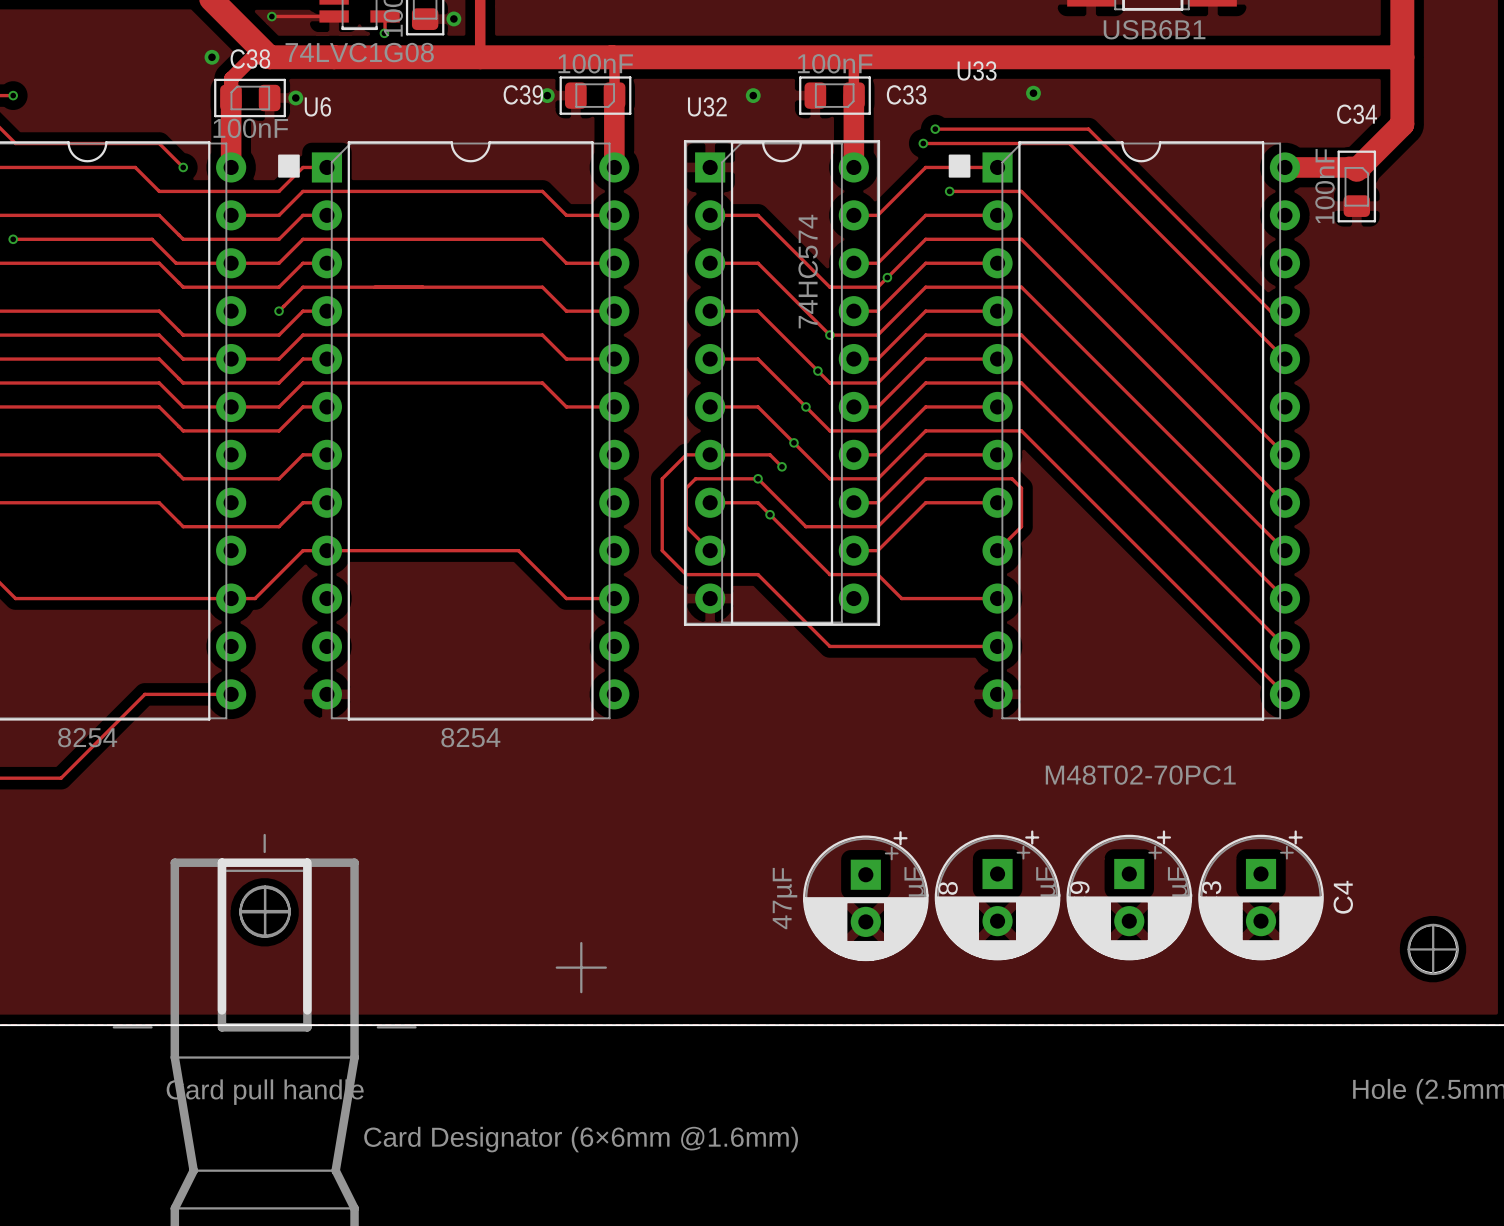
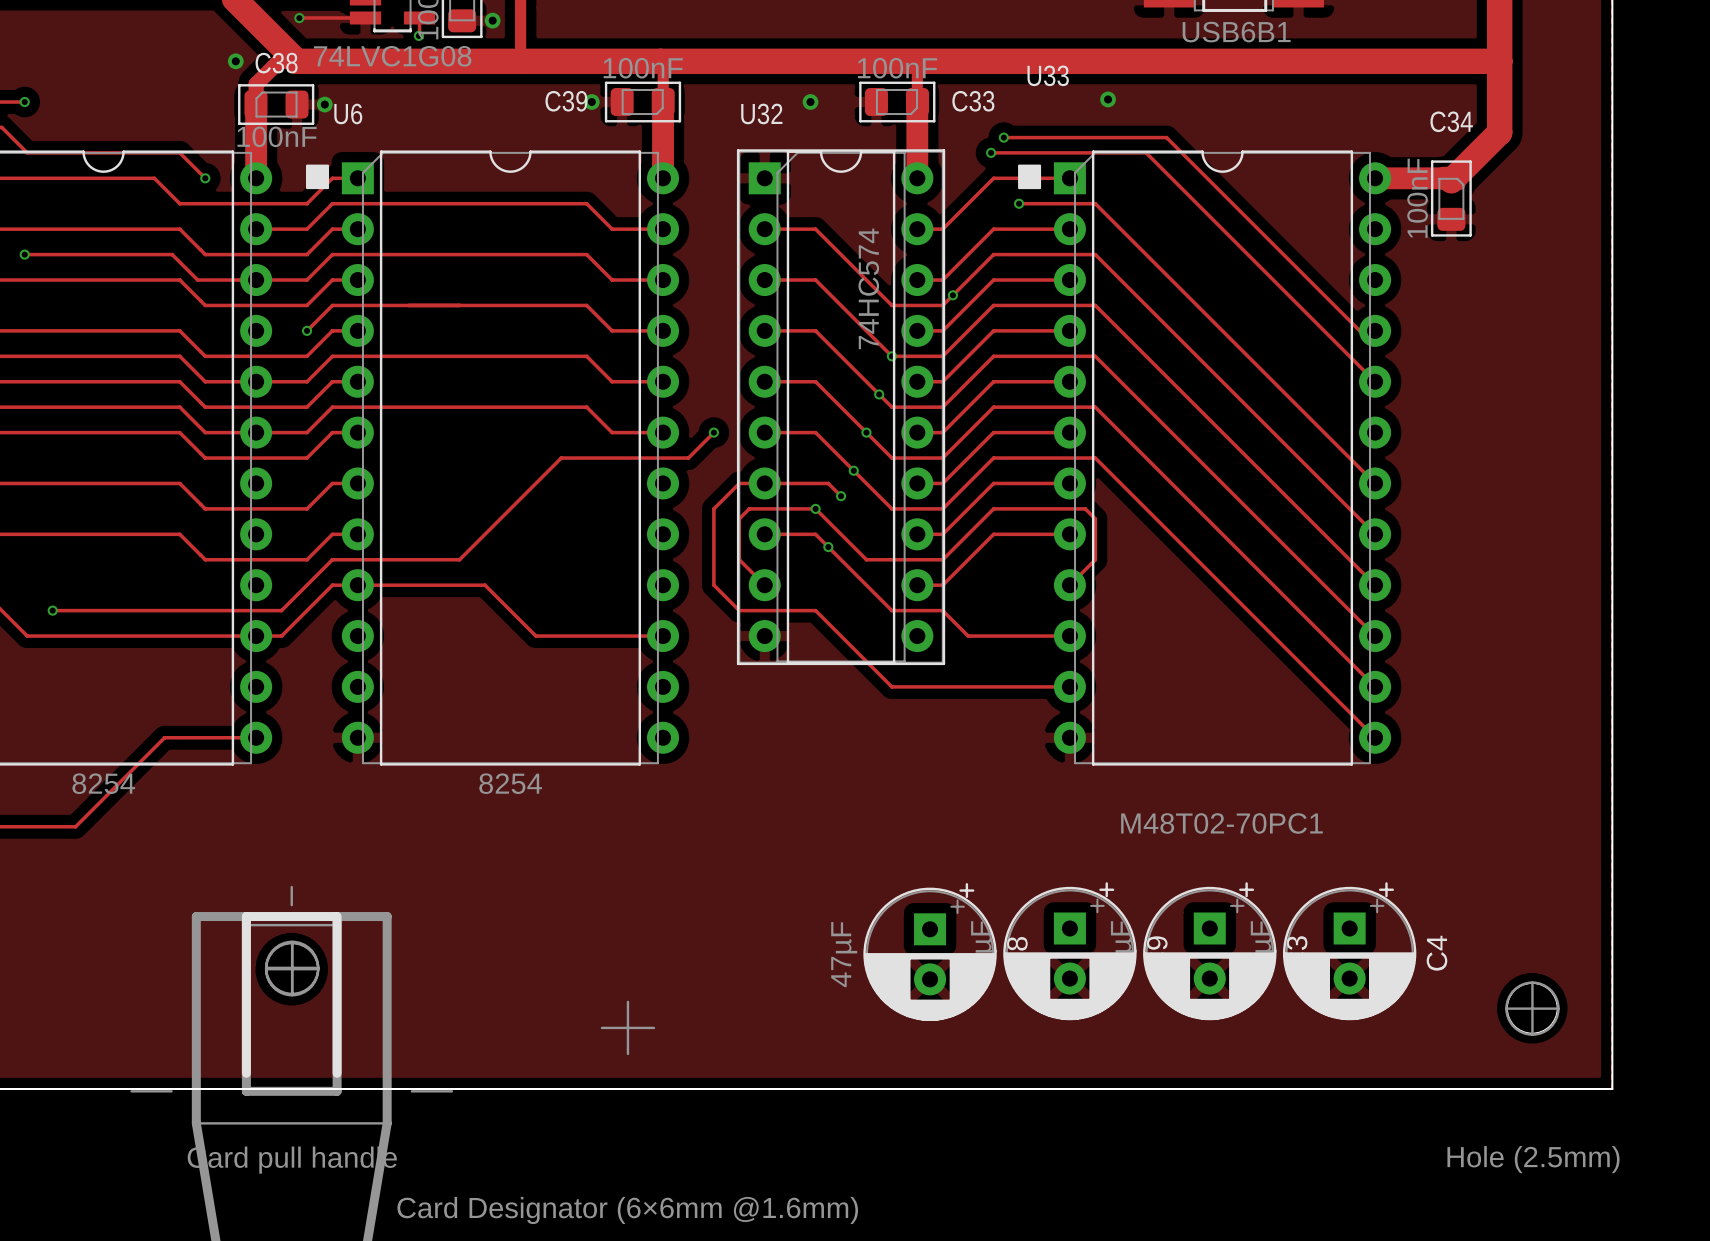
track: none -> (713, 432) (688, 458) (561, 458) (459, 559) (332, 559) (281, 610) (52, 610)
via: none -> (713, 432)
track: (446, 550) (518, 550) (566, 598) -> (485, 585) (535, 636) (612, 636)
via: none -> (52, 610)

